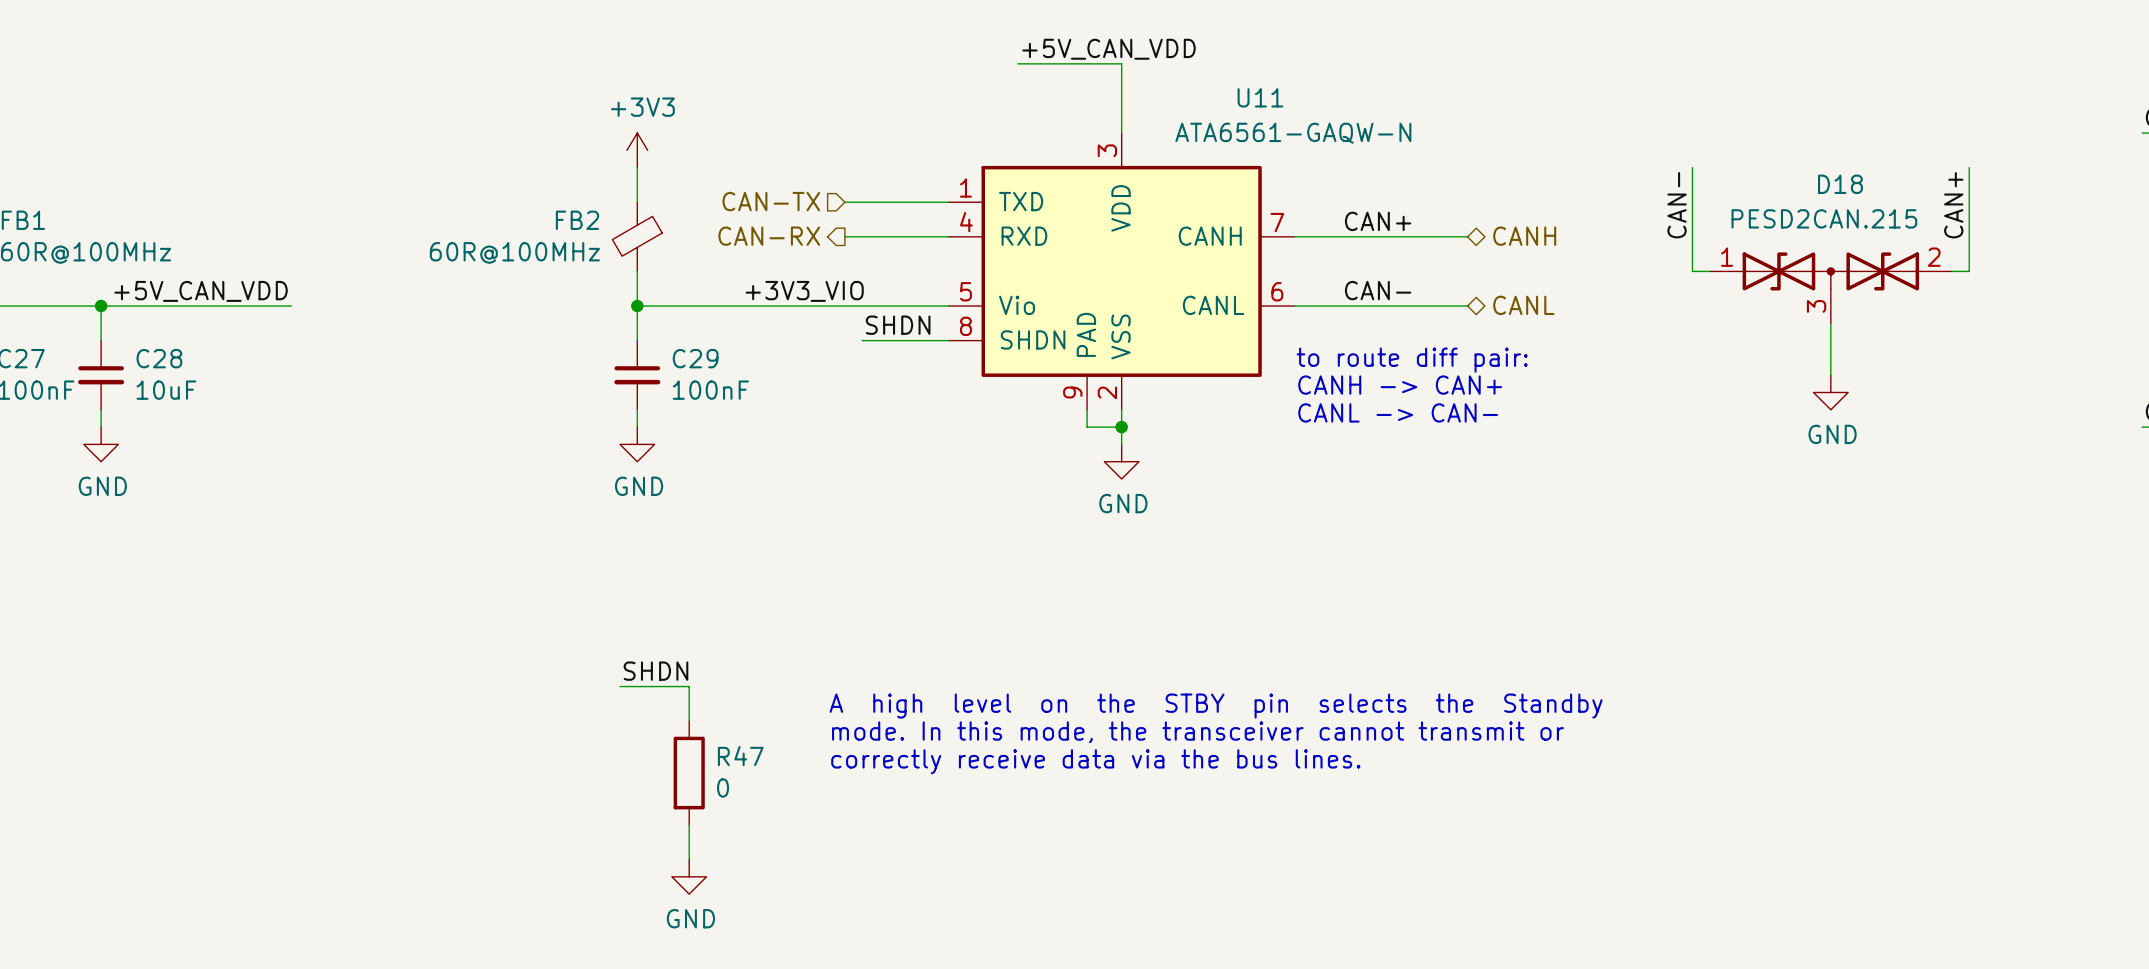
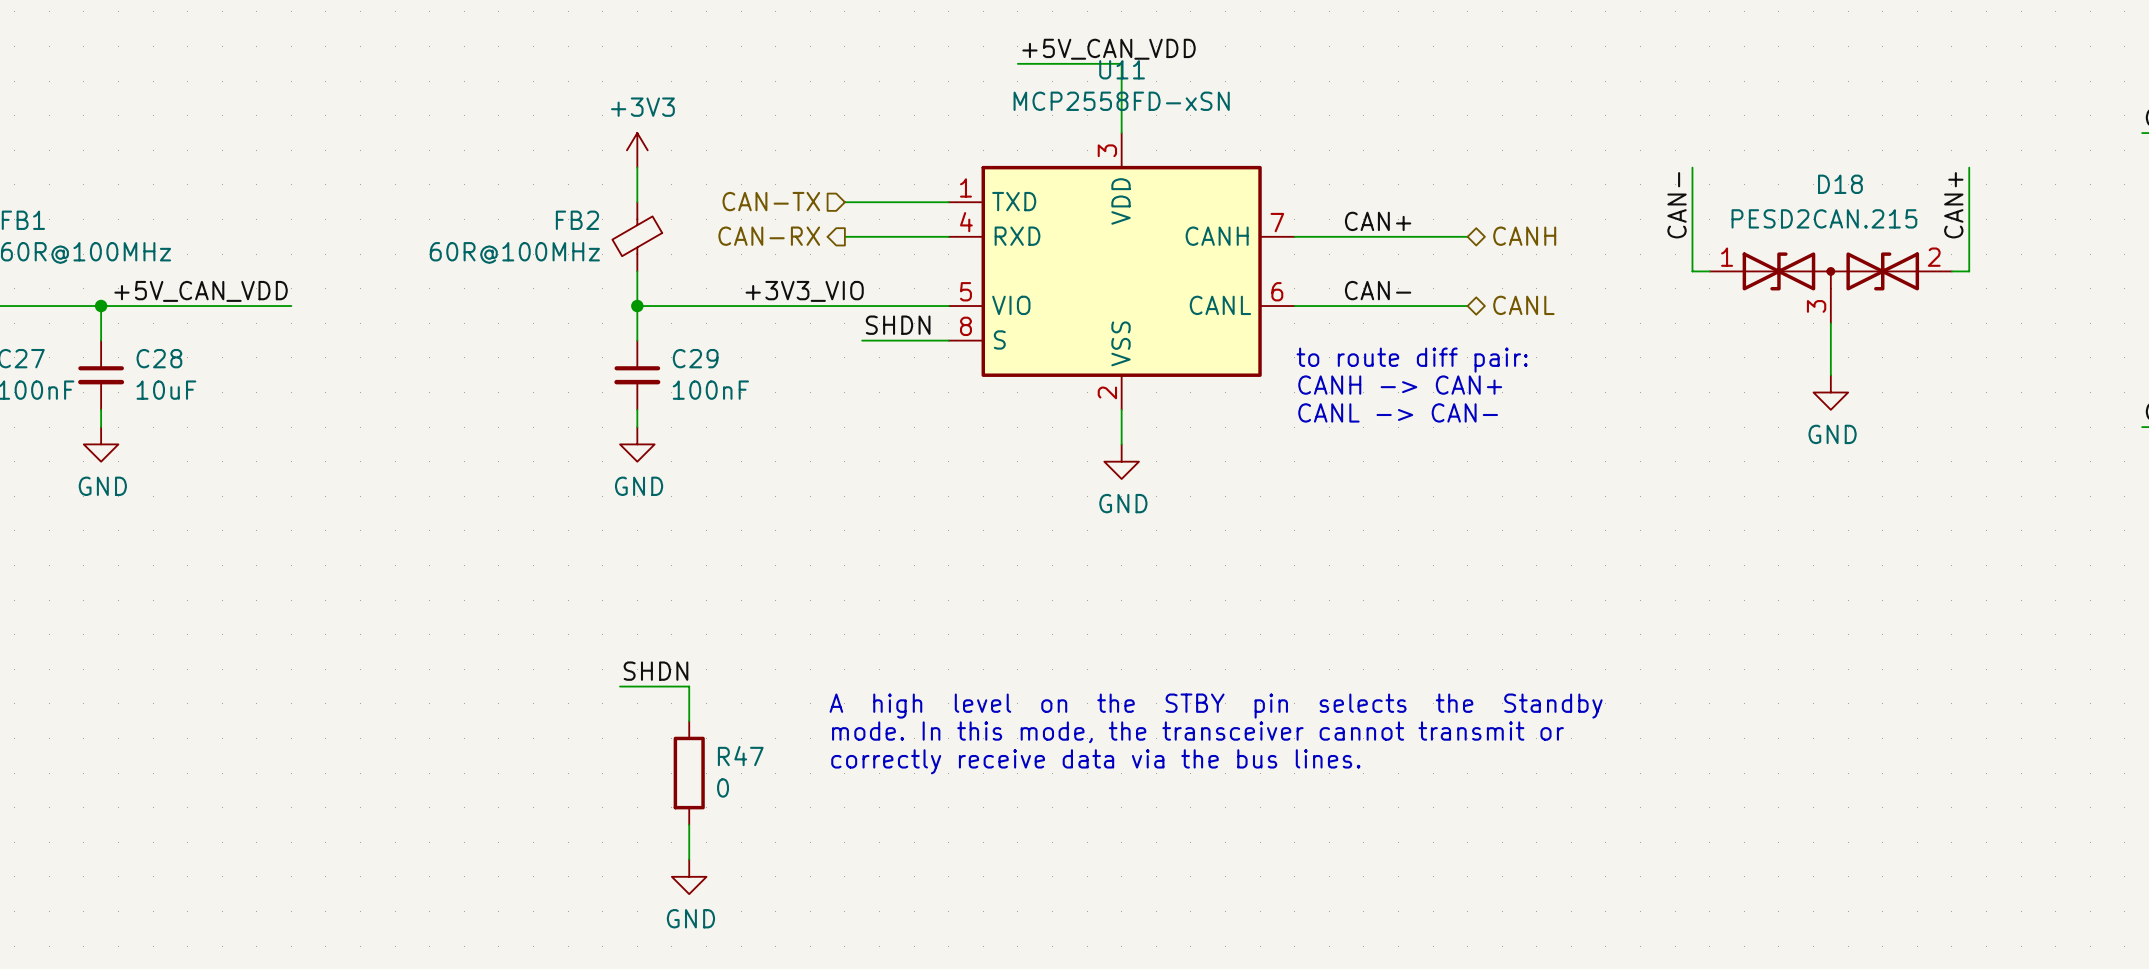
U11 name position: U11 (1260, 97) -> U11 (1122, 69)
U11 symbol: [948, 133, 1295, 410] -> [948, 133, 1295, 410]
U11 value: ATA6561-GAQW-N (1293, 133) -> MCP2558FD-xSN (1121, 101)
wire: (1087, 409) (1087, 427) (1121, 427) -> none
junction: (1121, 427) -> none

